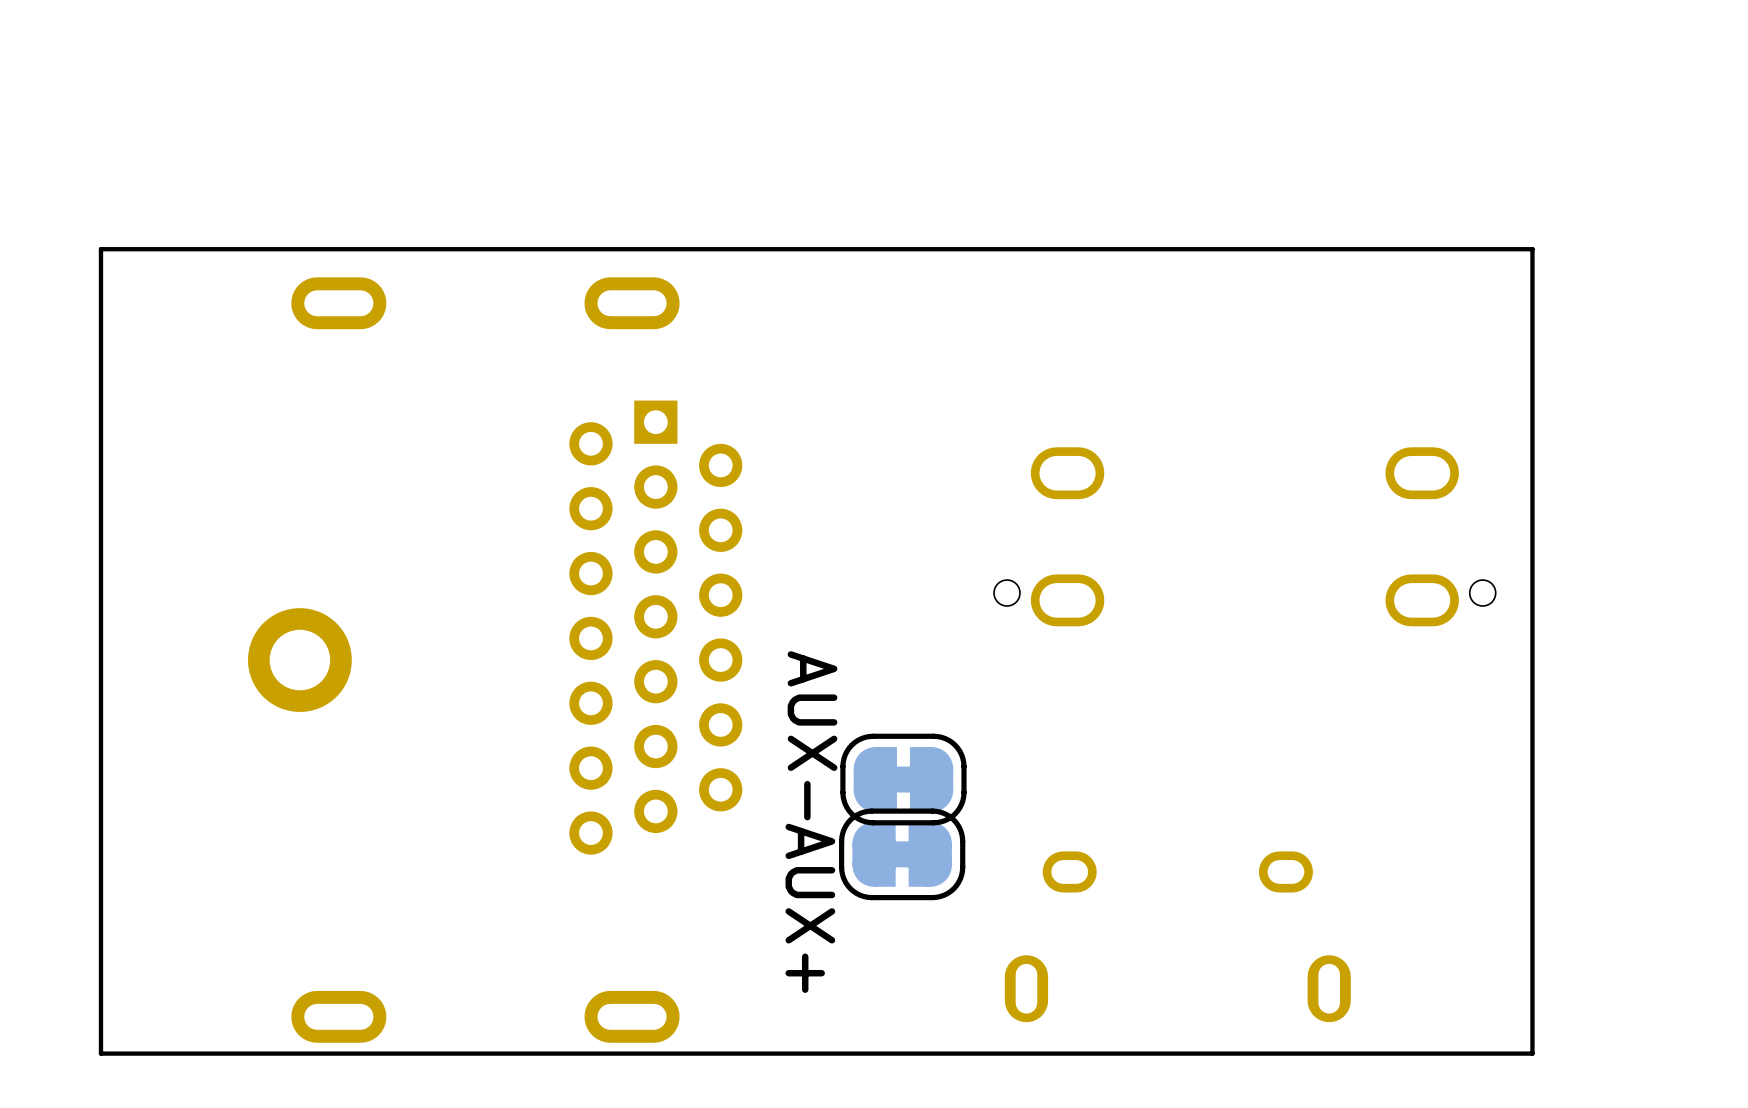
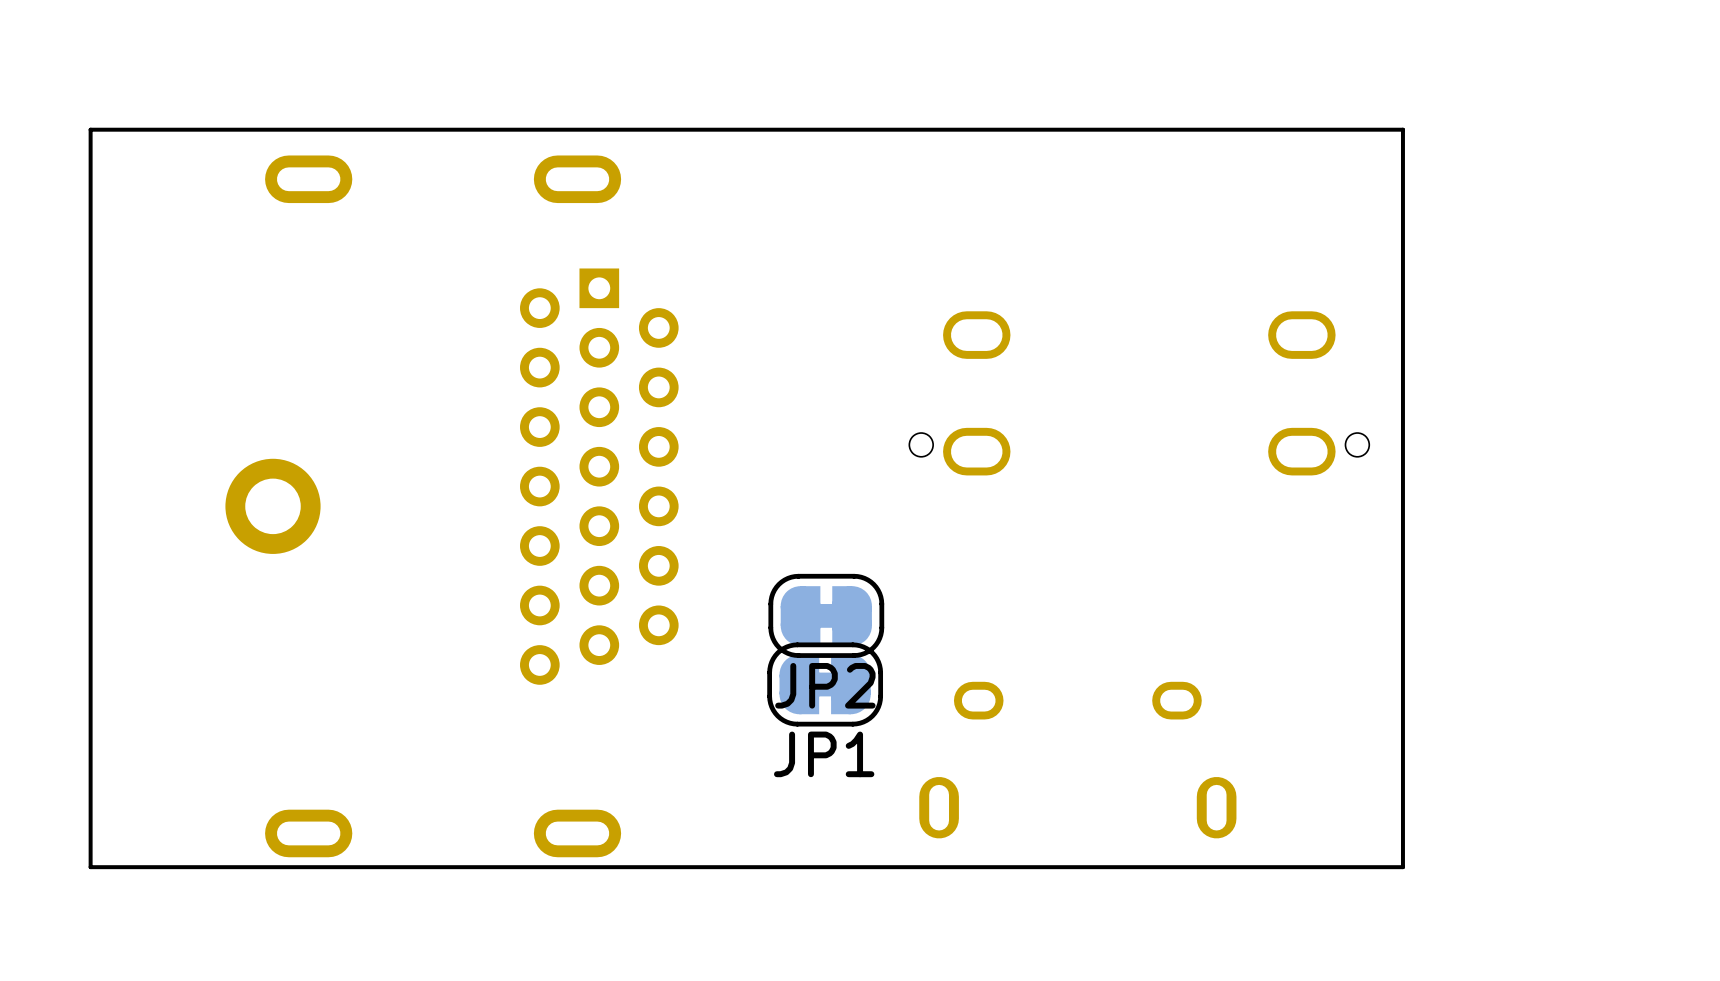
AUX- name: AUX- (812, 735) -> JP2 (825, 685)
AUX+ name: AUX+ (810, 908) -> JP1 (824, 754)

